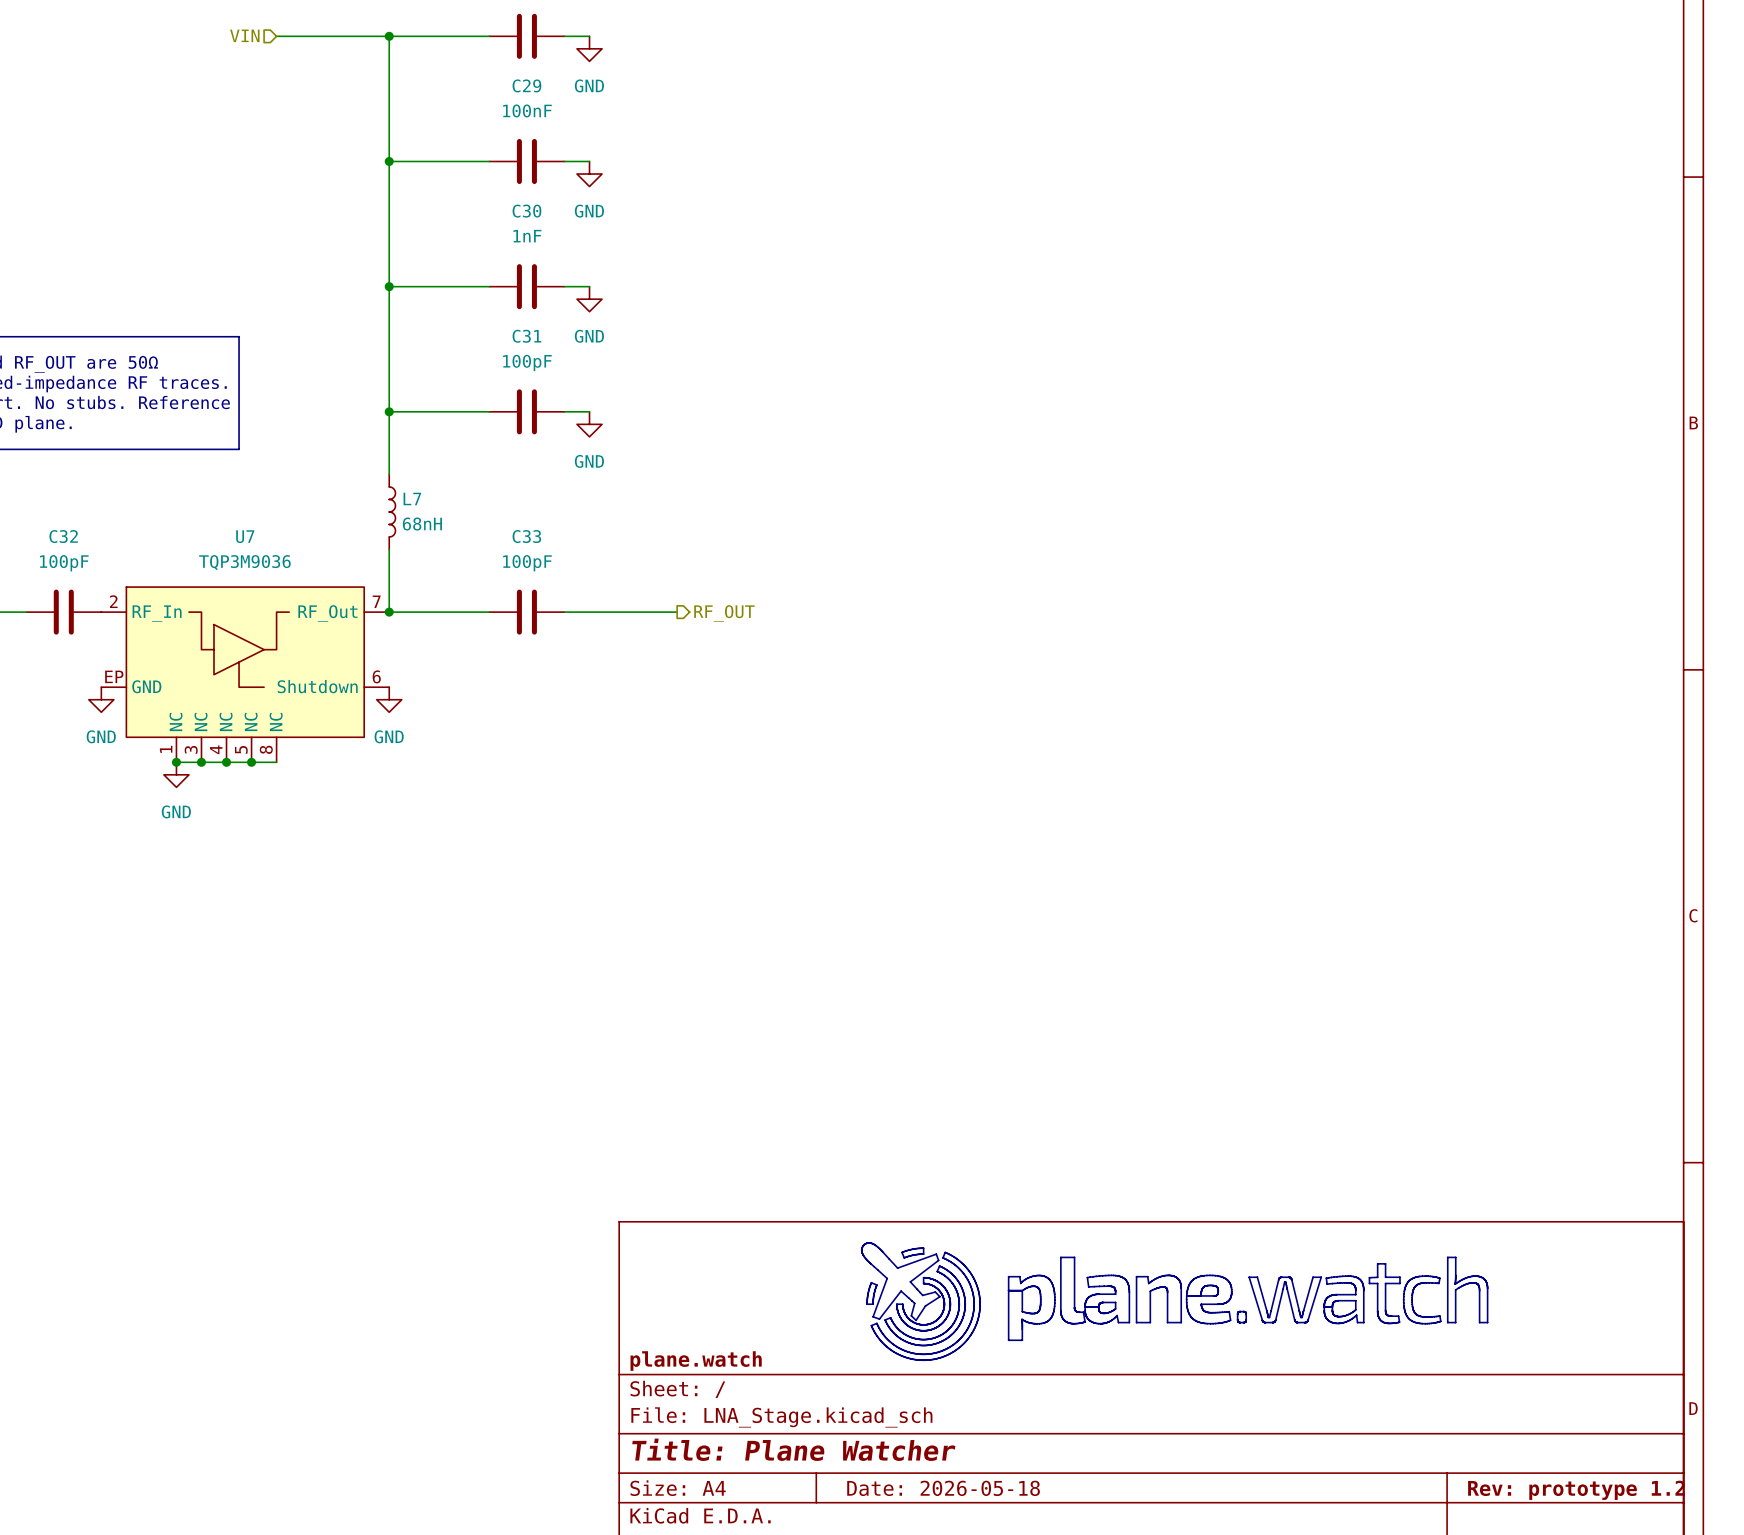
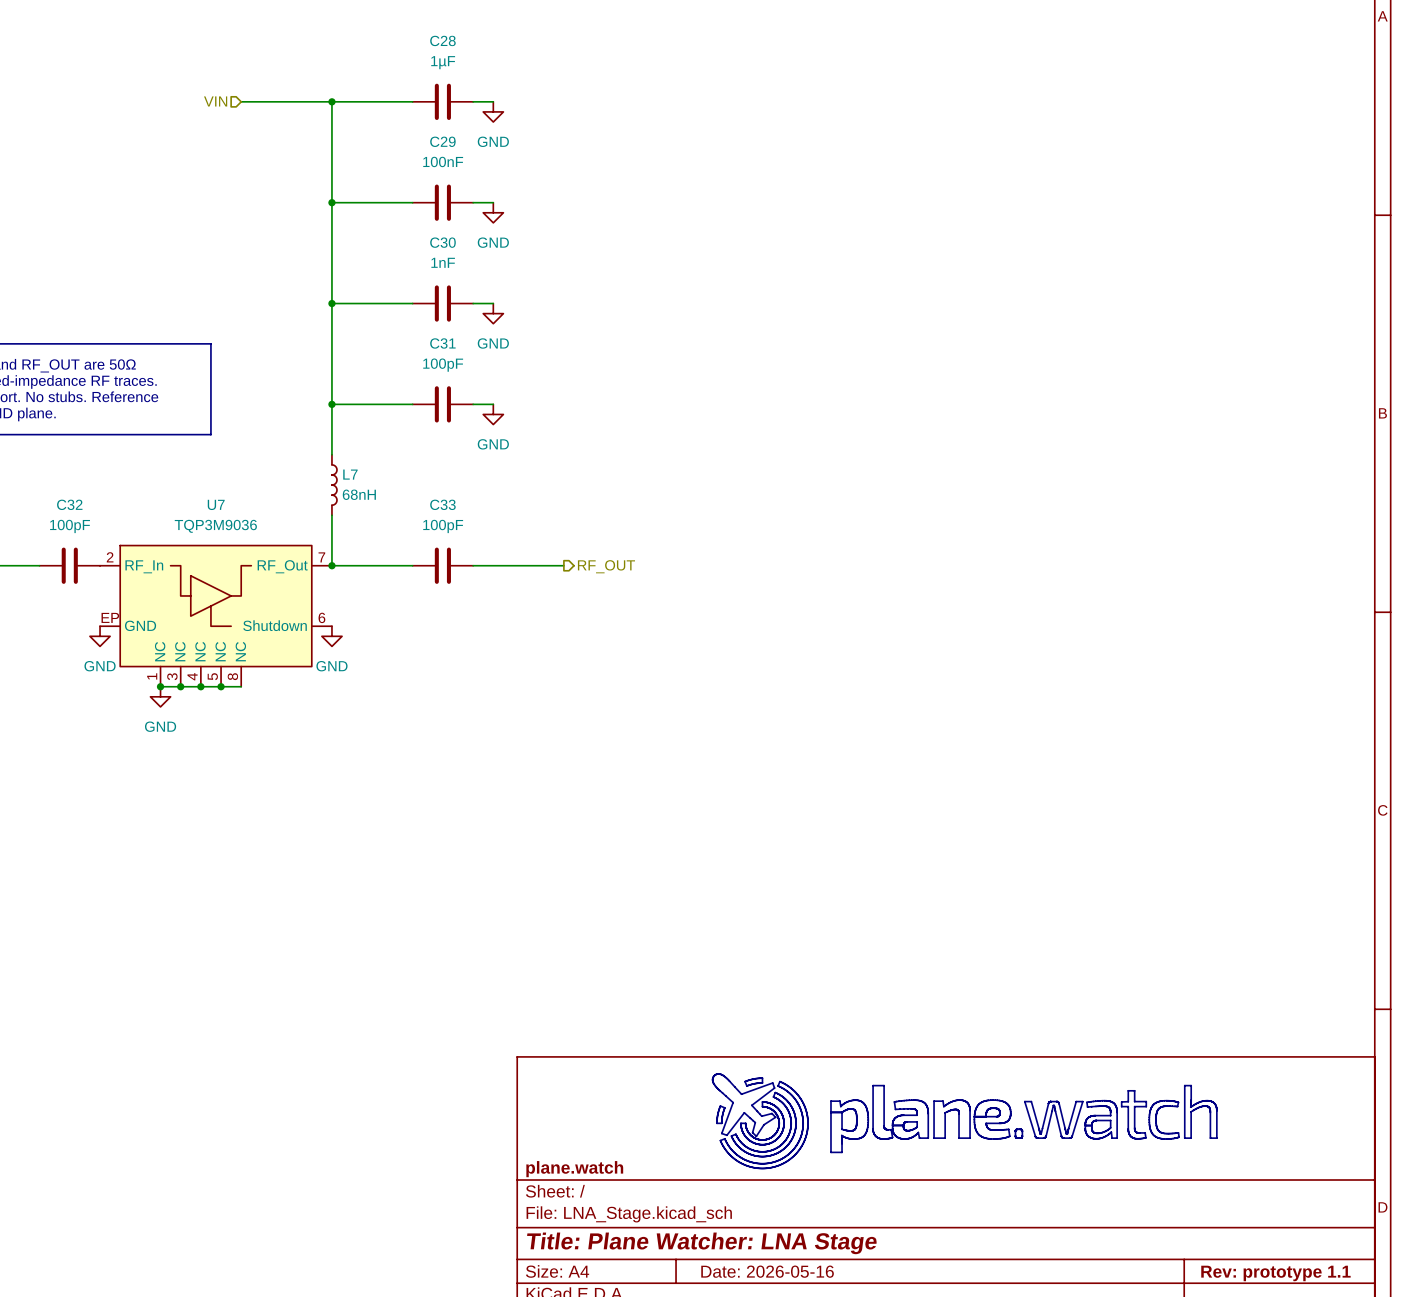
title block: Title: Plane Watcher (793, 1449) -> Title: Plane Watcher: LNA Stage (702, 1243)
title block: Date: 2026-05-18 (943, 1488) -> Date: 2026-05-16 (767, 1271)
title block: Rev: prototype 1.2 (1576, 1490) -> Rev: prototype 1.1 (1275, 1273)

